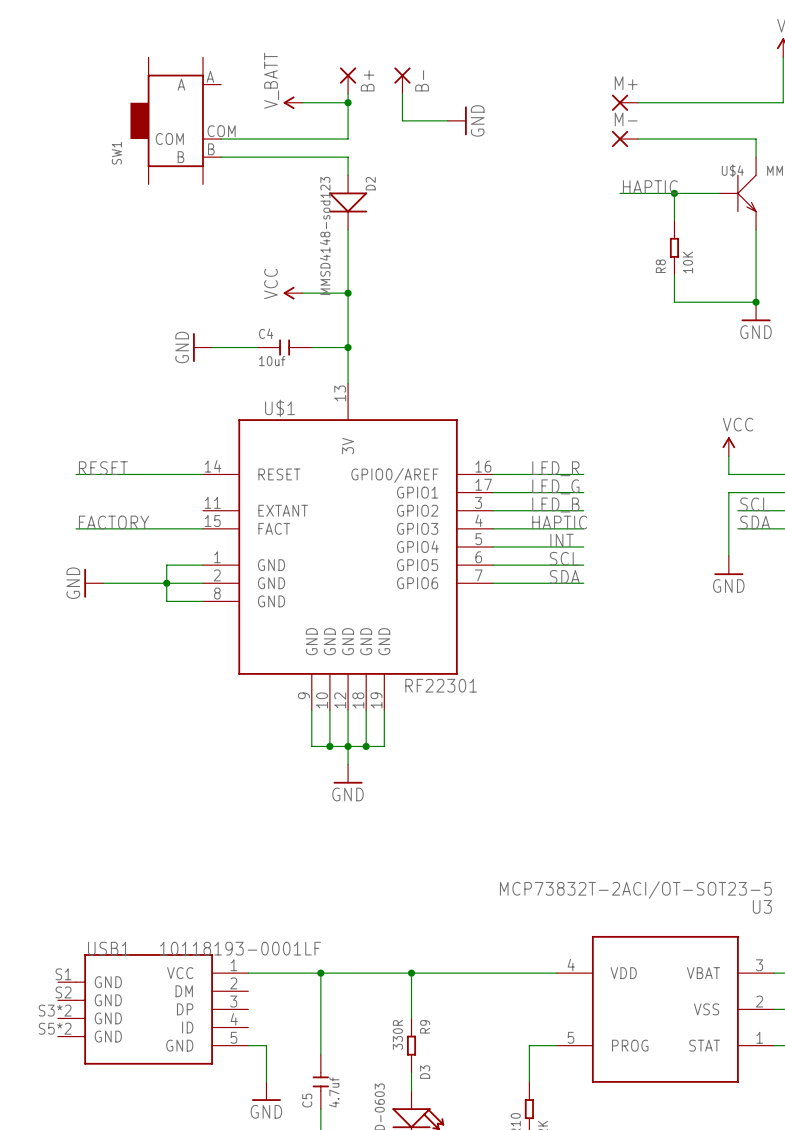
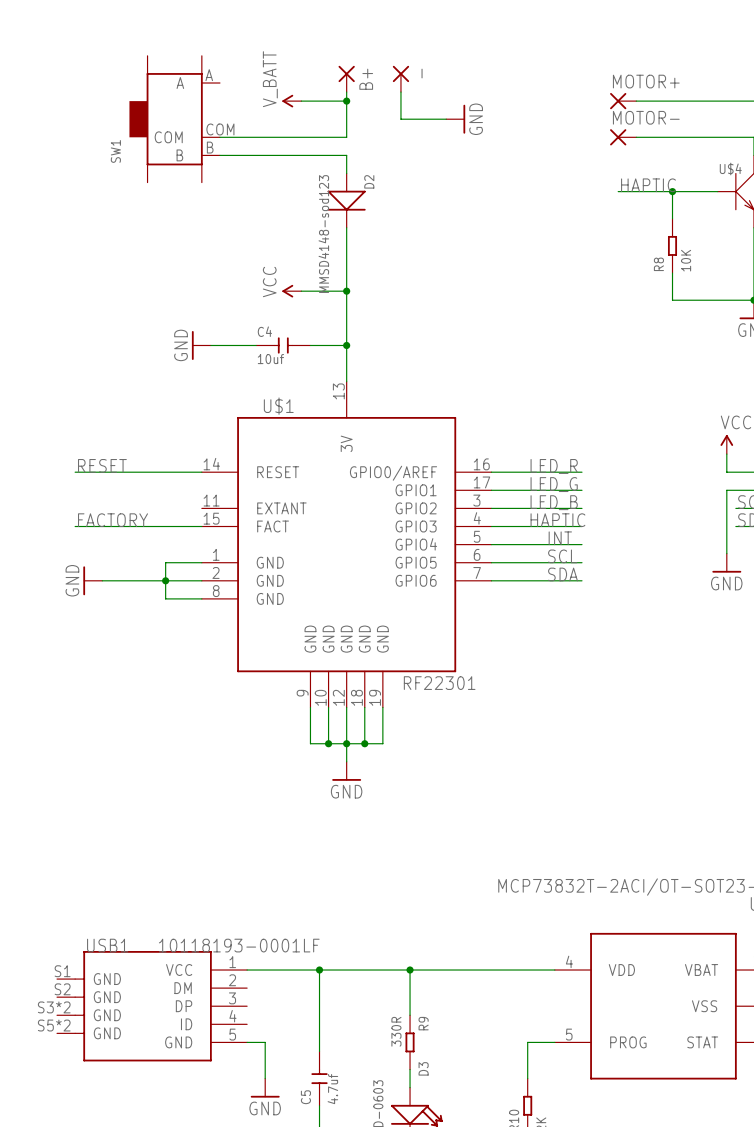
B- name: B- (422, 80) -> - (422, 73)
M+ name: M+ (626, 83) -> MOTOR+ (646, 81)
M- name: M- (626, 119) -> MOTOR- (646, 117)

